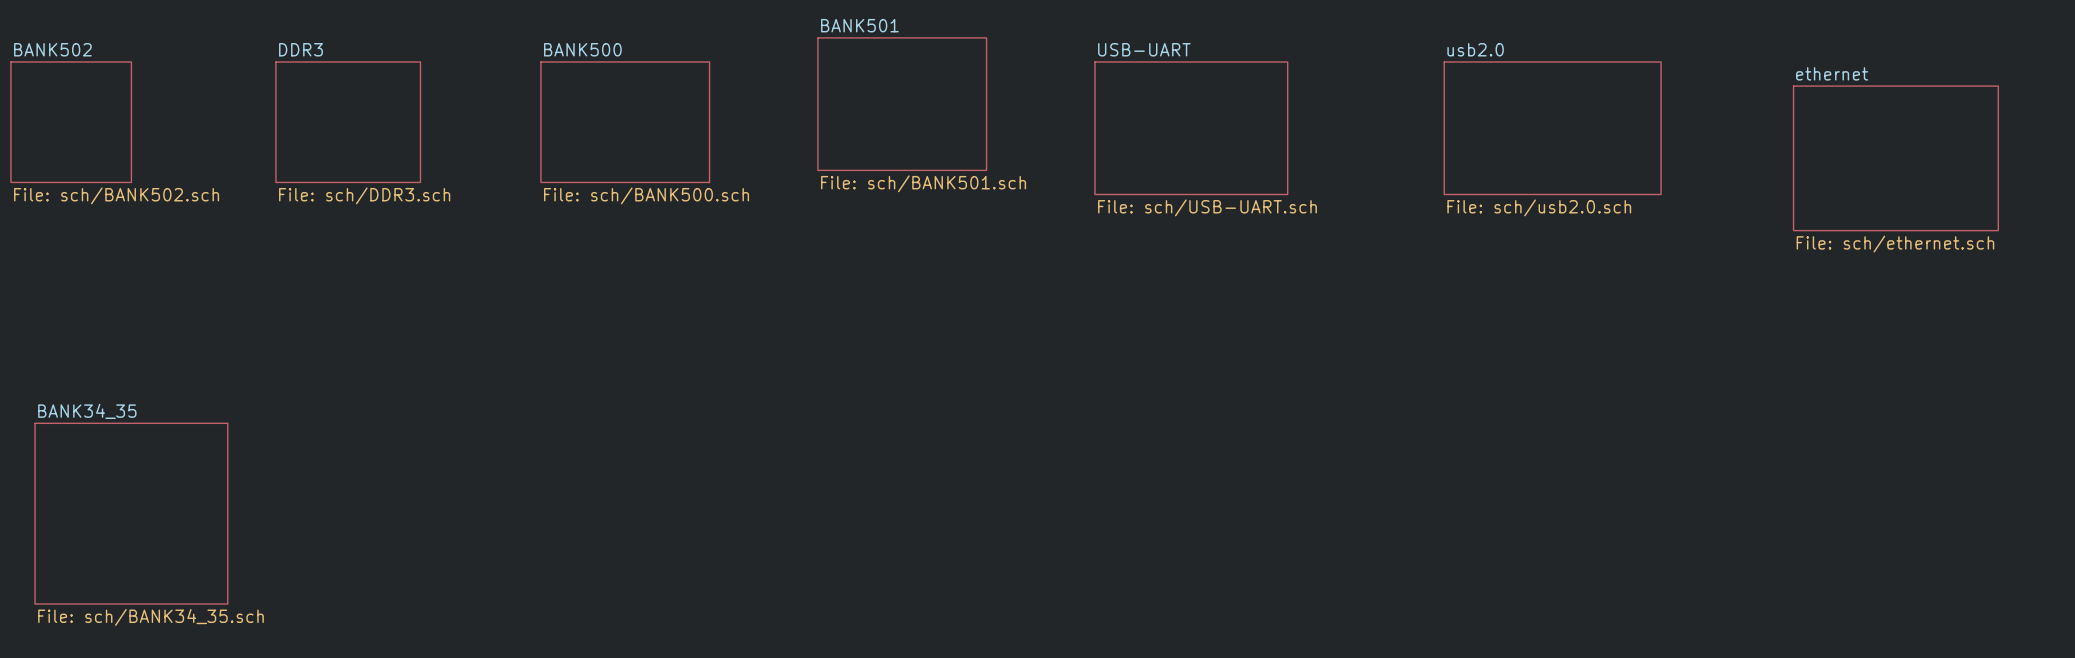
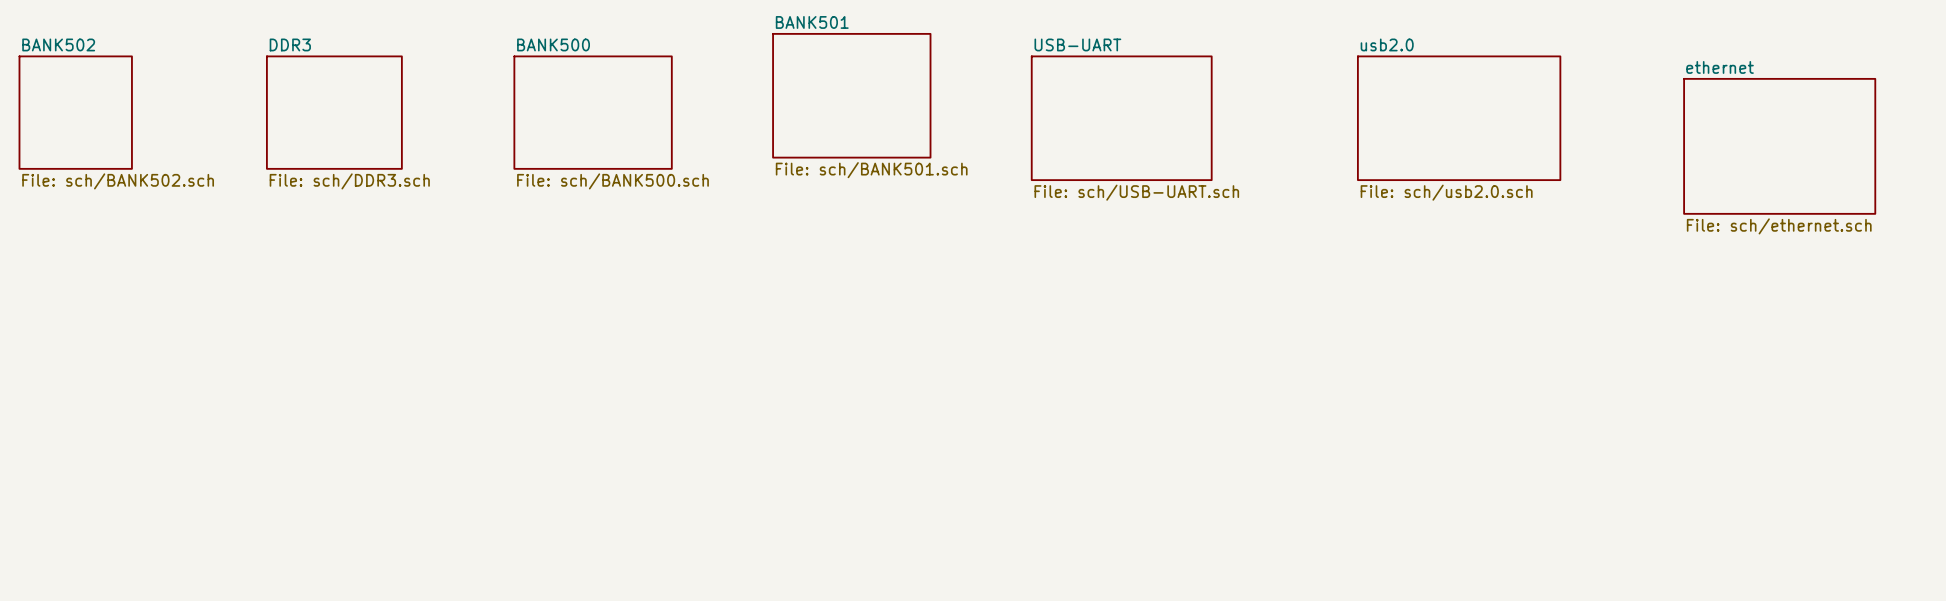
sheet BANK34_35: File: sch/BANK34_35.sch (131, 513) -> none

